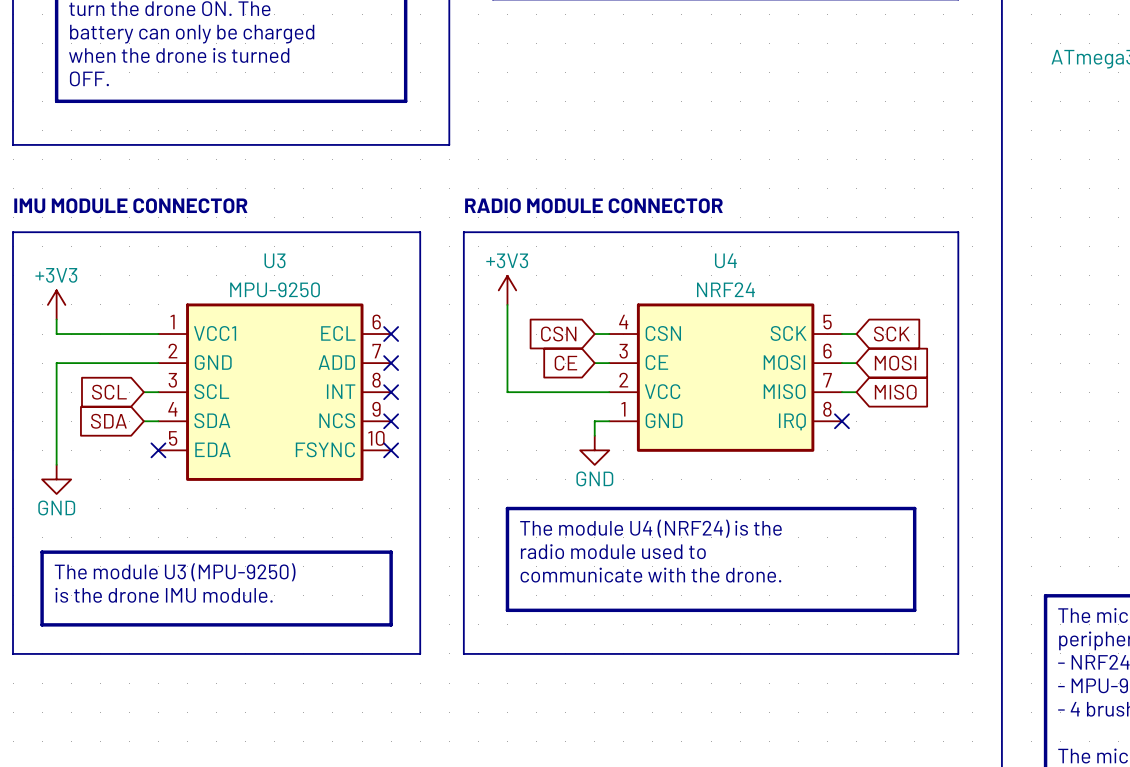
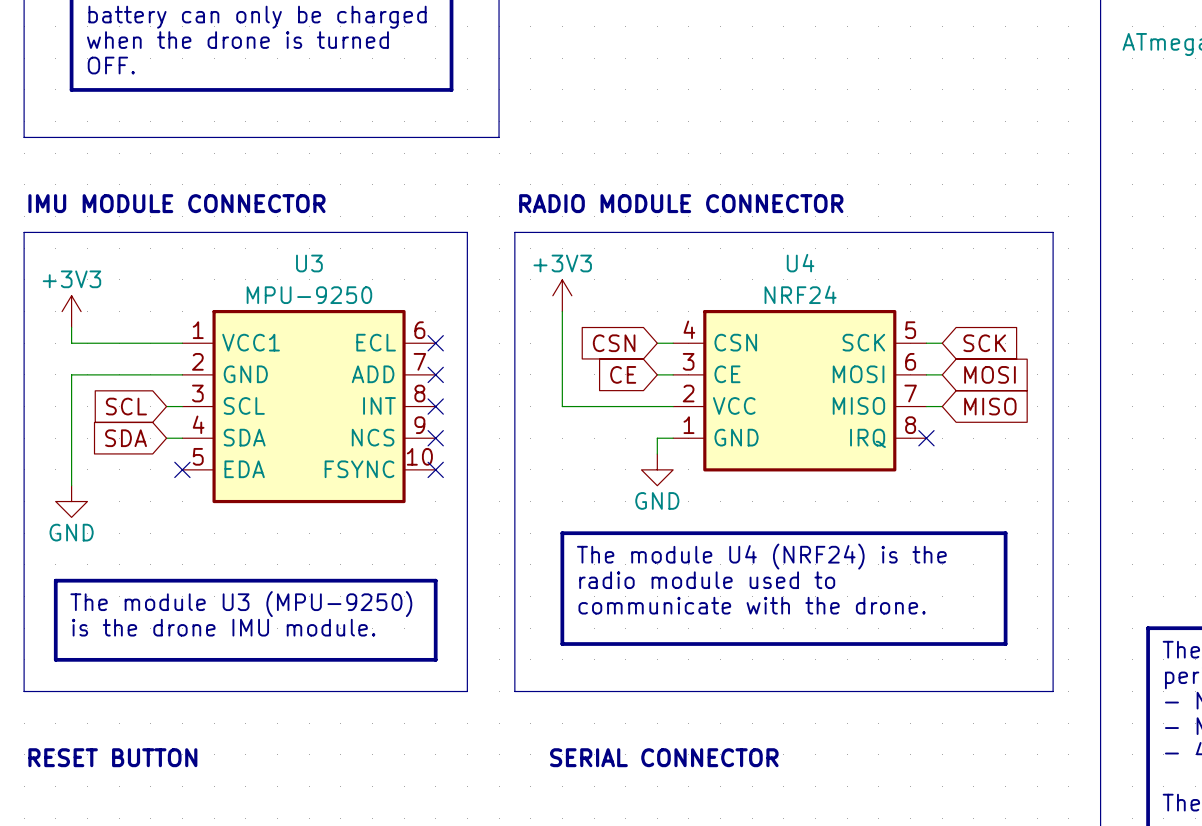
text: none -> RESET BUTTON (112, 757)
text: none -> SERIAL CONNECTOR (664, 757)

